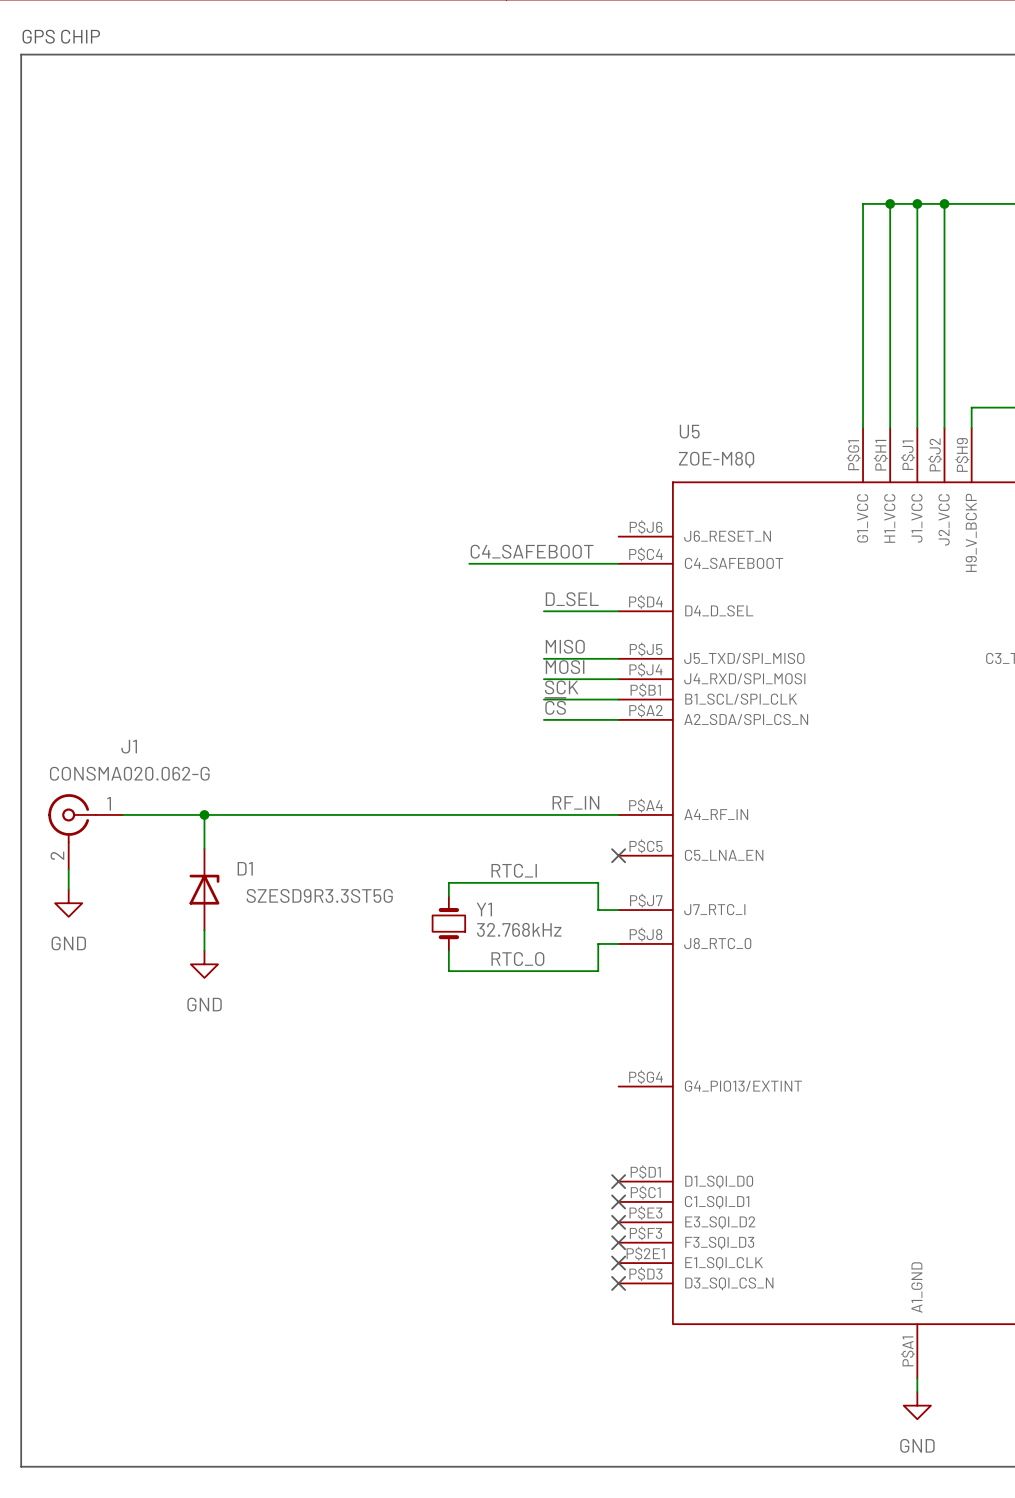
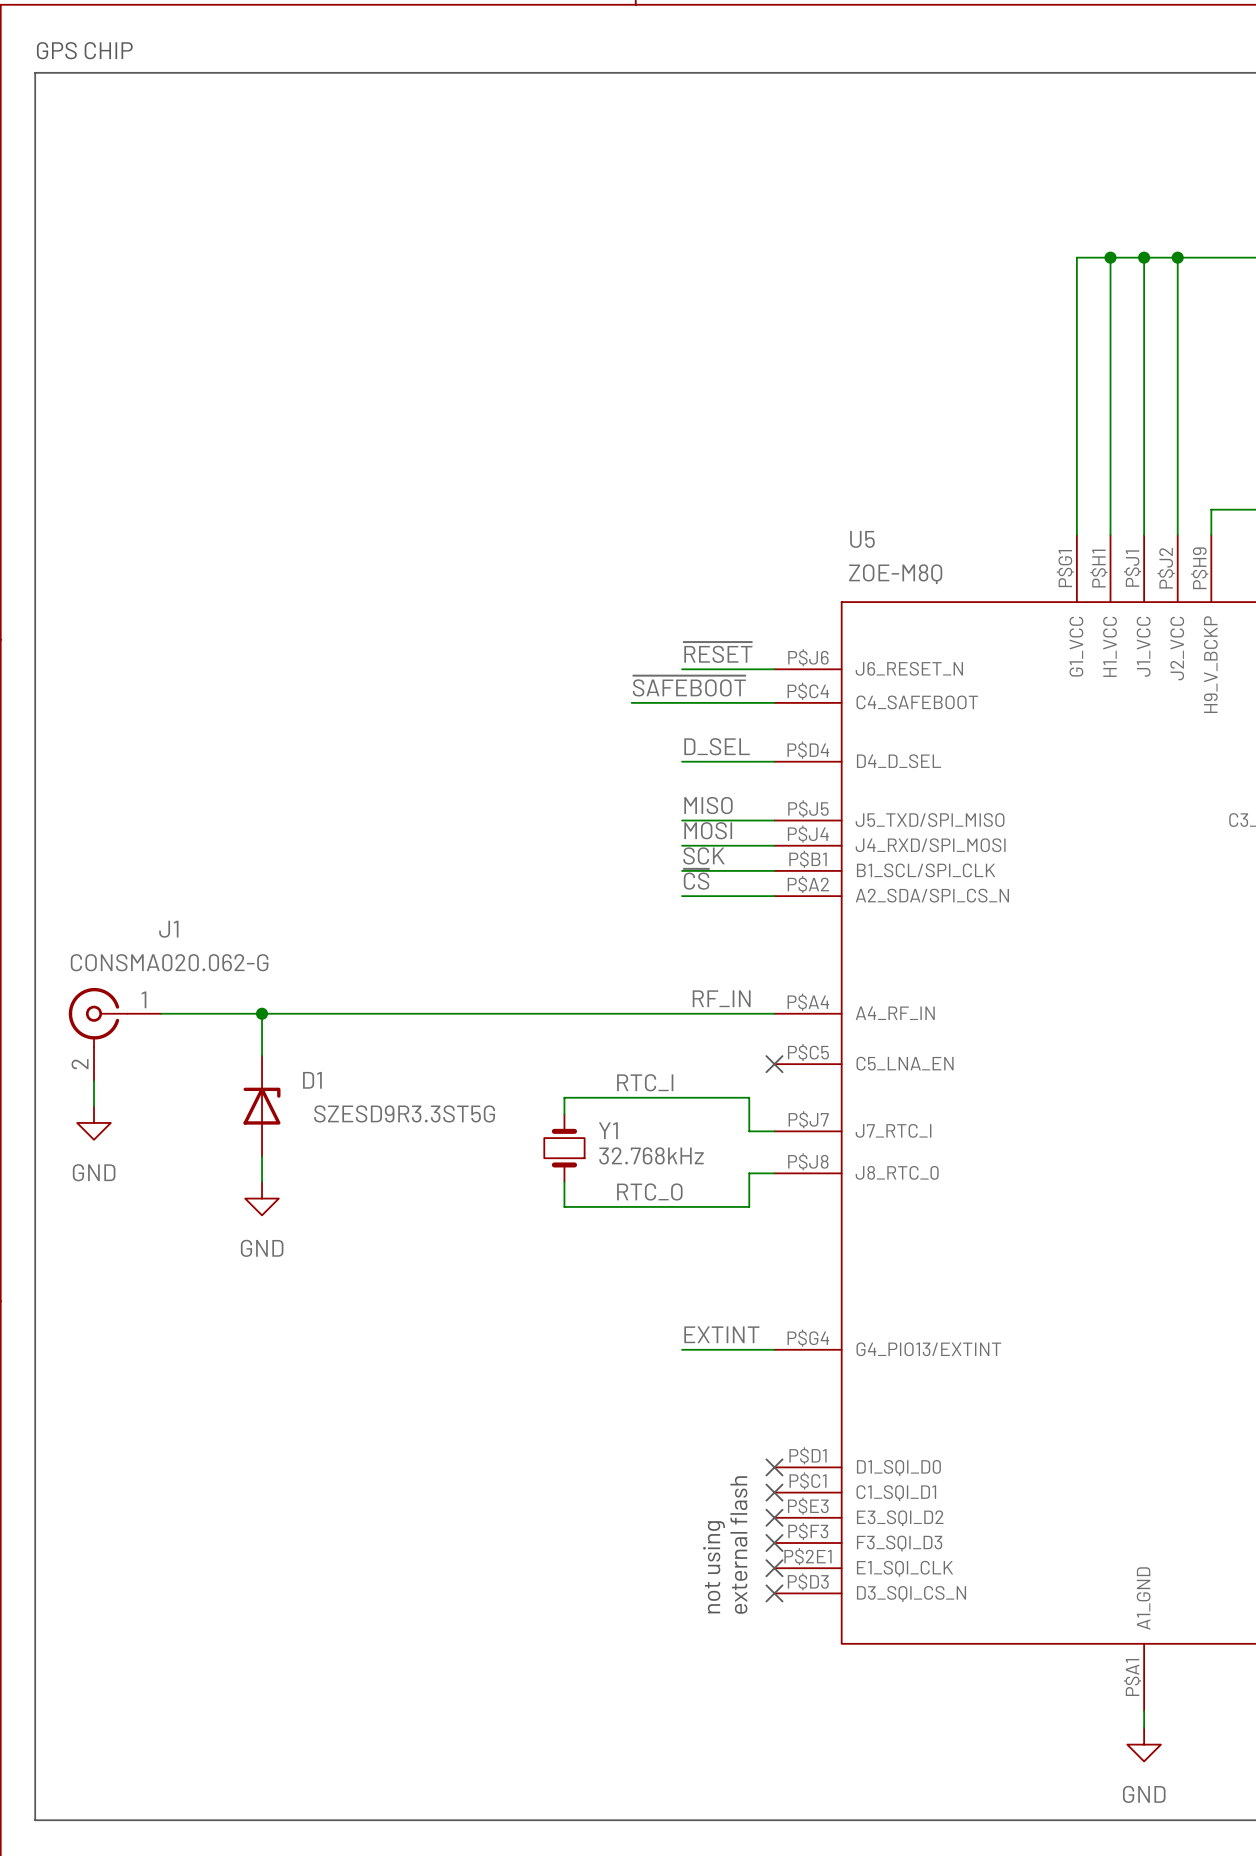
label: none -> ~{RESET} (718, 652)
wire: none -> (682, 669) (774, 669)
label: C4_SAFEBOOT (532, 551) -> ~{SAFEBOOT} (689, 686)
wire: (469, 563) (503, 563) -> none
label: none -> EXTINT (721, 1334)
wire: none -> (682, 1349) (774, 1349)
text: none -> external flash (738, 1544)
text: none -> not using (714, 1567)

